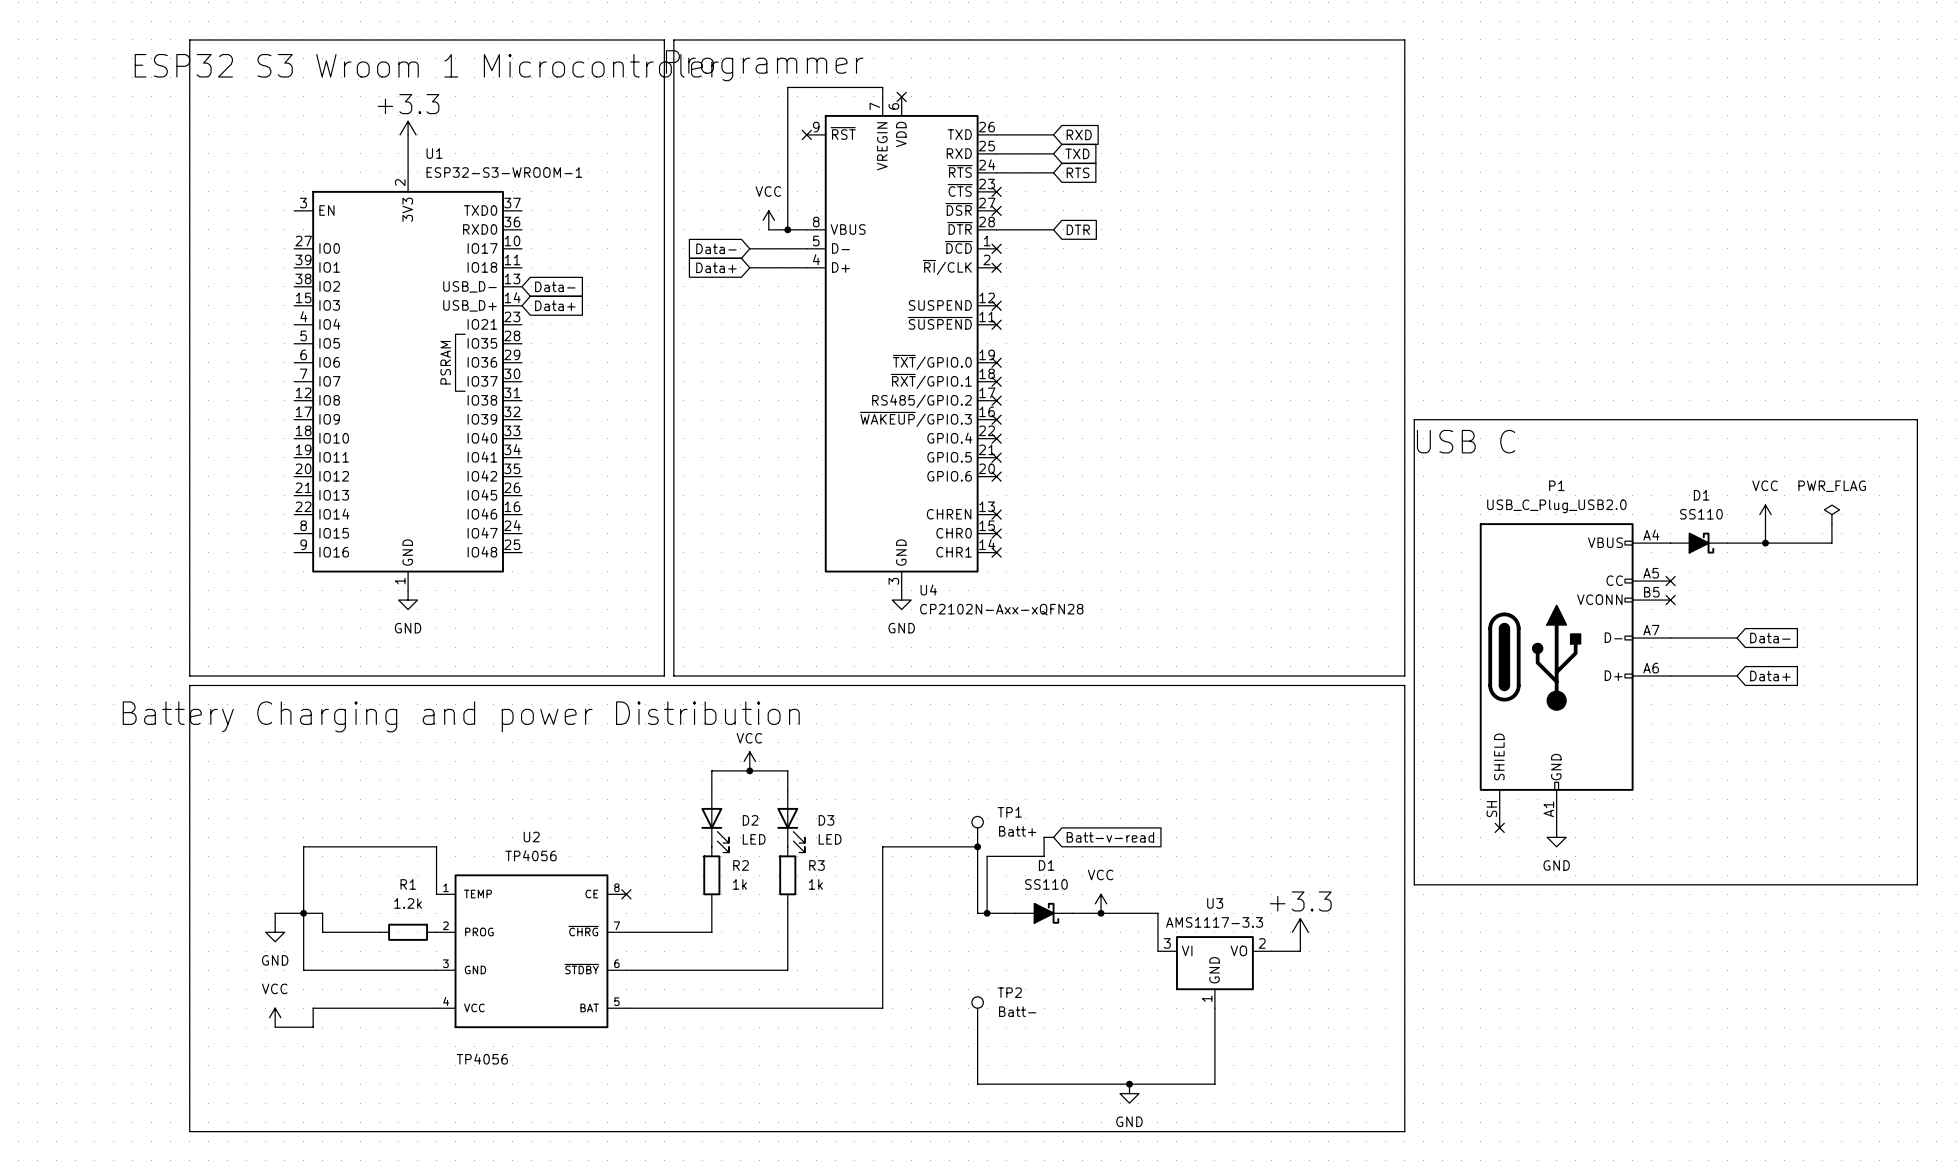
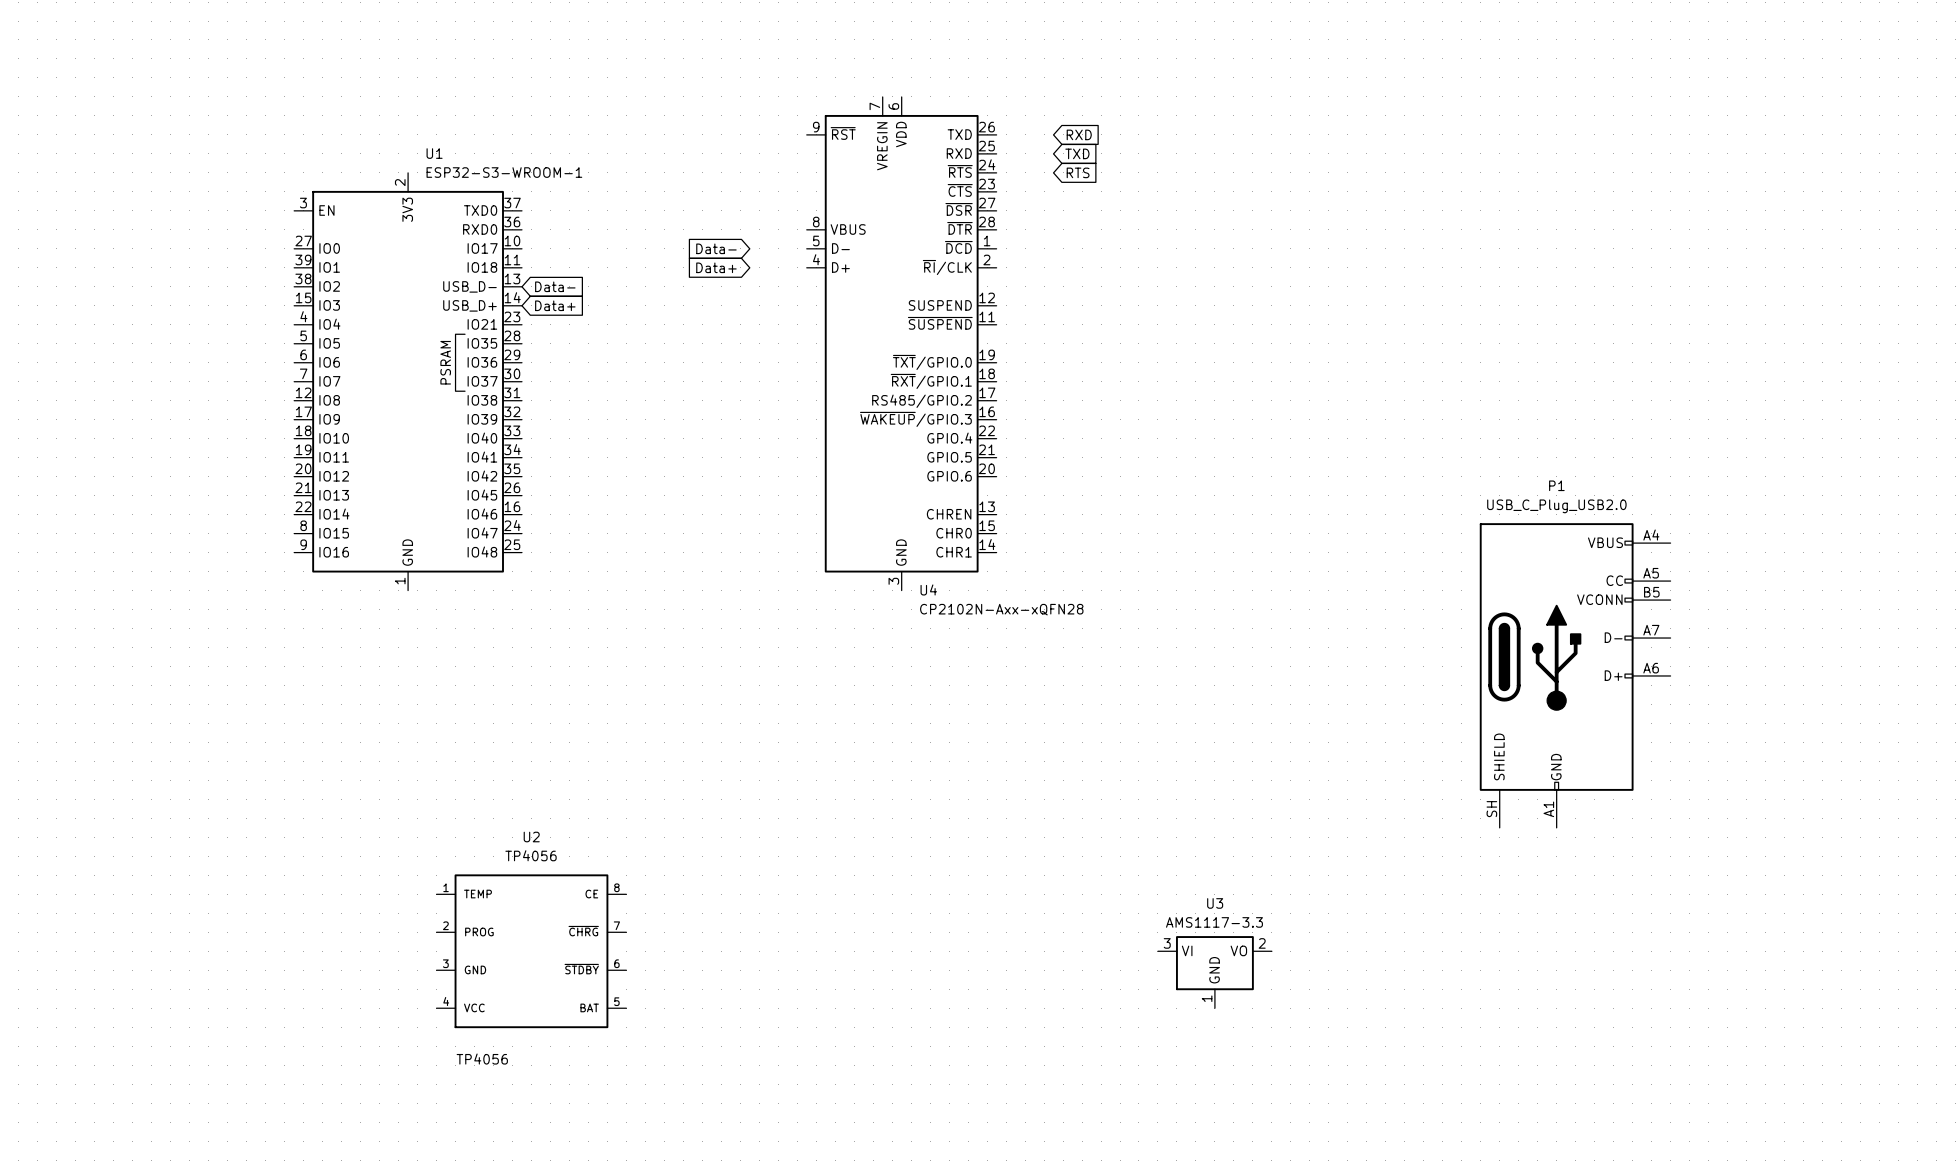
line: (189, 39) (664, 39) (664, 675) (189, 675) (189, 39) -> none
line: (673, 39) (1404, 39) (1404, 675) (673, 675) (673, 39) -> none
text: ESP32 S3 Wroom 1 Microcontroler (426, 65) -> none
text: Programmer (764, 65) -> none
wire: (882, 96) (882, 87) (787, 87) (787, 229) -> none
no-connect mark: (901, 96) -> none
power symbol: (408, 128) -> none
wire: (408, 134) (408, 172) -> none
no-connect mark: (806, 134) -> none
wire: (996, 134) (1053, 134) -> none
wire: (996, 153) (1053, 153) -> none
wire: (996, 172) (1053, 172) -> none
no-connect mark: (996, 191) -> none
no-connect mark: (996, 210) -> none
power symbol: VCC (768, 220) -> none
wire: (768, 229) (806, 229) -> none
junction: (787, 229) -> none
wire: (996, 229) (1053, 229) -> none
global label: DTR (1078, 229) -> none
wire: (749, 248) (806, 248) -> none
no-connect mark: (996, 248) -> none
wire: (749, 267) (806, 267) -> none
no-connect mark: (996, 267) -> none
no-connect mark: (996, 305) -> none
no-connect mark: (996, 324) -> none
no-connect mark: (996, 362) -> none
no-connect mark: (996, 381) -> none
no-connect mark: (996, 400) -> none
no-connect mark: (996, 419) -> none
line: (1414, 419) (1917, 419) (1917, 884) (1414, 884) (1414, 419) -> none
no-connect mark: (996, 438) -> none
text: USB C (1466, 441) -> none
no-connect mark: (996, 457) -> none
no-connect mark: (996, 476) -> none
no-connect mark: (996, 514) -> none
power symbol: VCC (1765, 514) -> none
power symbol: PWR_FLAG (1831, 514) -> none
wire: (1765, 524) (1765, 543) -> none
wire: (1831, 524) (1831, 543) (1727, 543) -> none
no-connect mark: (996, 533) -> none
D1: SS110 (1699, 543) -> none
junction: (1765, 543) -> none
no-connect mark: (996, 552) -> none
no-connect mark: (1670, 581) -> none
power symbol: GND (408, 600) -> none
power symbol: GND (901, 600) -> none
no-connect mark: (1670, 600) -> none
wire: (1670, 638) (1737, 638) -> none
global label: Data- (1770, 638) -> none
wire: (1670, 675) (1737, 675) -> none
global label: Data+ (1770, 675) -> none
line: (189, 685) (189, 1131) (1404, 1131) (1404, 685) (189, 685) -> none
text: Battery Charging and power Distribution (461, 716) -> none
power symbol: VCC (749, 761) -> none
junction: (749, 770) -> none
wire: (711, 789) (711, 770) (787, 770) (787, 789) -> none
D2: LED (715, 821) -> none
D3: LED (791, 821) -> none
no-connect mark: (1499, 827) -> none
TP1: Batt+ (977, 831) -> none
wire: (1053, 837) (1044, 837) (1044, 856) (987, 856) (987, 913) -> none
global label: Batt-v-read (1110, 837) -> none
power symbol: GND (1556, 837) -> none
junction: (977, 846) -> none
R2: 1k (711, 875) -> none
R3: 1k (787, 875) -> none
wire: (436, 894) (436, 846) (303, 846) (303, 970) (436, 970) -> none
no-connect mark: (626, 894) -> none
wire: (711, 903) (711, 932) (626, 932) -> none
wire: (787, 903) (787, 970) (626, 970) -> none
power symbol: VCC (1101, 903) -> none
junction: (303, 913) -> none
junction: (987, 913) -> none
wire: (1015, 913) (977, 913) (977, 846) (882, 846) (882, 1008) (626, 1008) -> none
D1: SS110 (1044, 913) -> none
wire: (1072, 913) (1157, 913) (1157, 951) -> none
junction: (1101, 913) -> none
wire: (275, 922) (275, 913) (322, 913) (322, 932) (379, 932) -> none
power symbol: (1300, 925) -> none
power symbol: GND (275, 932) -> none
R1: 1.2k (408, 932) -> none
wire: (1300, 932) (1300, 951) (1271, 951) -> none
wire: (436, 1008) (313, 1008) (313, 1027) (275, 1027) -> none
wire: (1214, 1008) (1214, 1084) (977, 1084) (977, 1027) -> none
TP2: Batt- (977, 1012) -> none
power symbol: VCC (275, 1017) -> none
junction: (1129, 1084) -> none
power symbol: GND (1129, 1093) -> none

